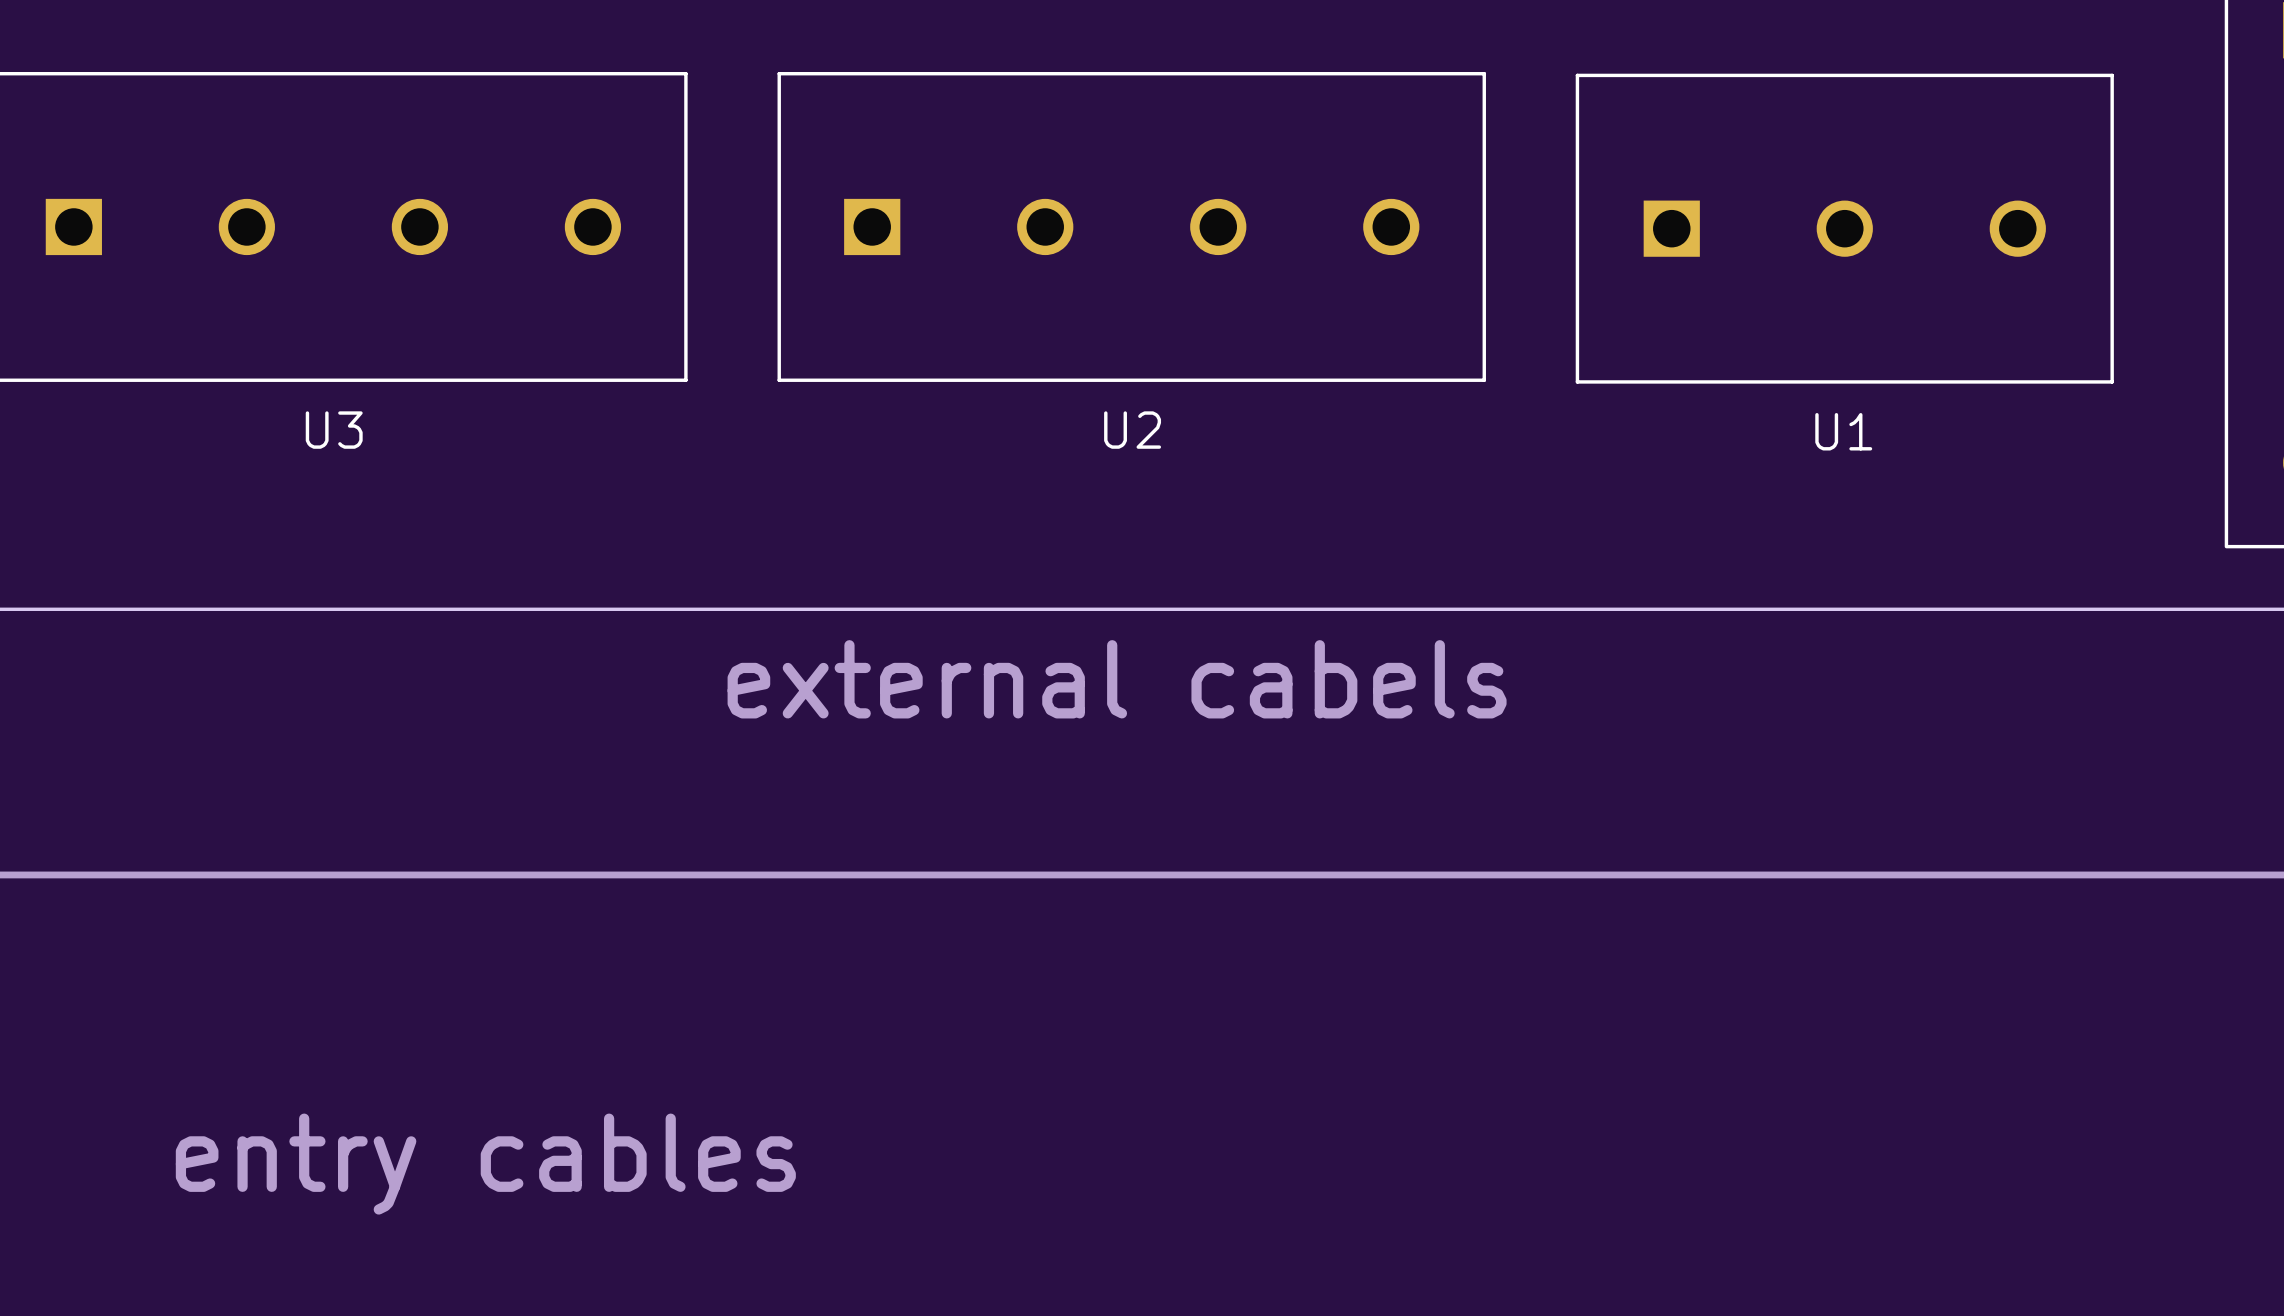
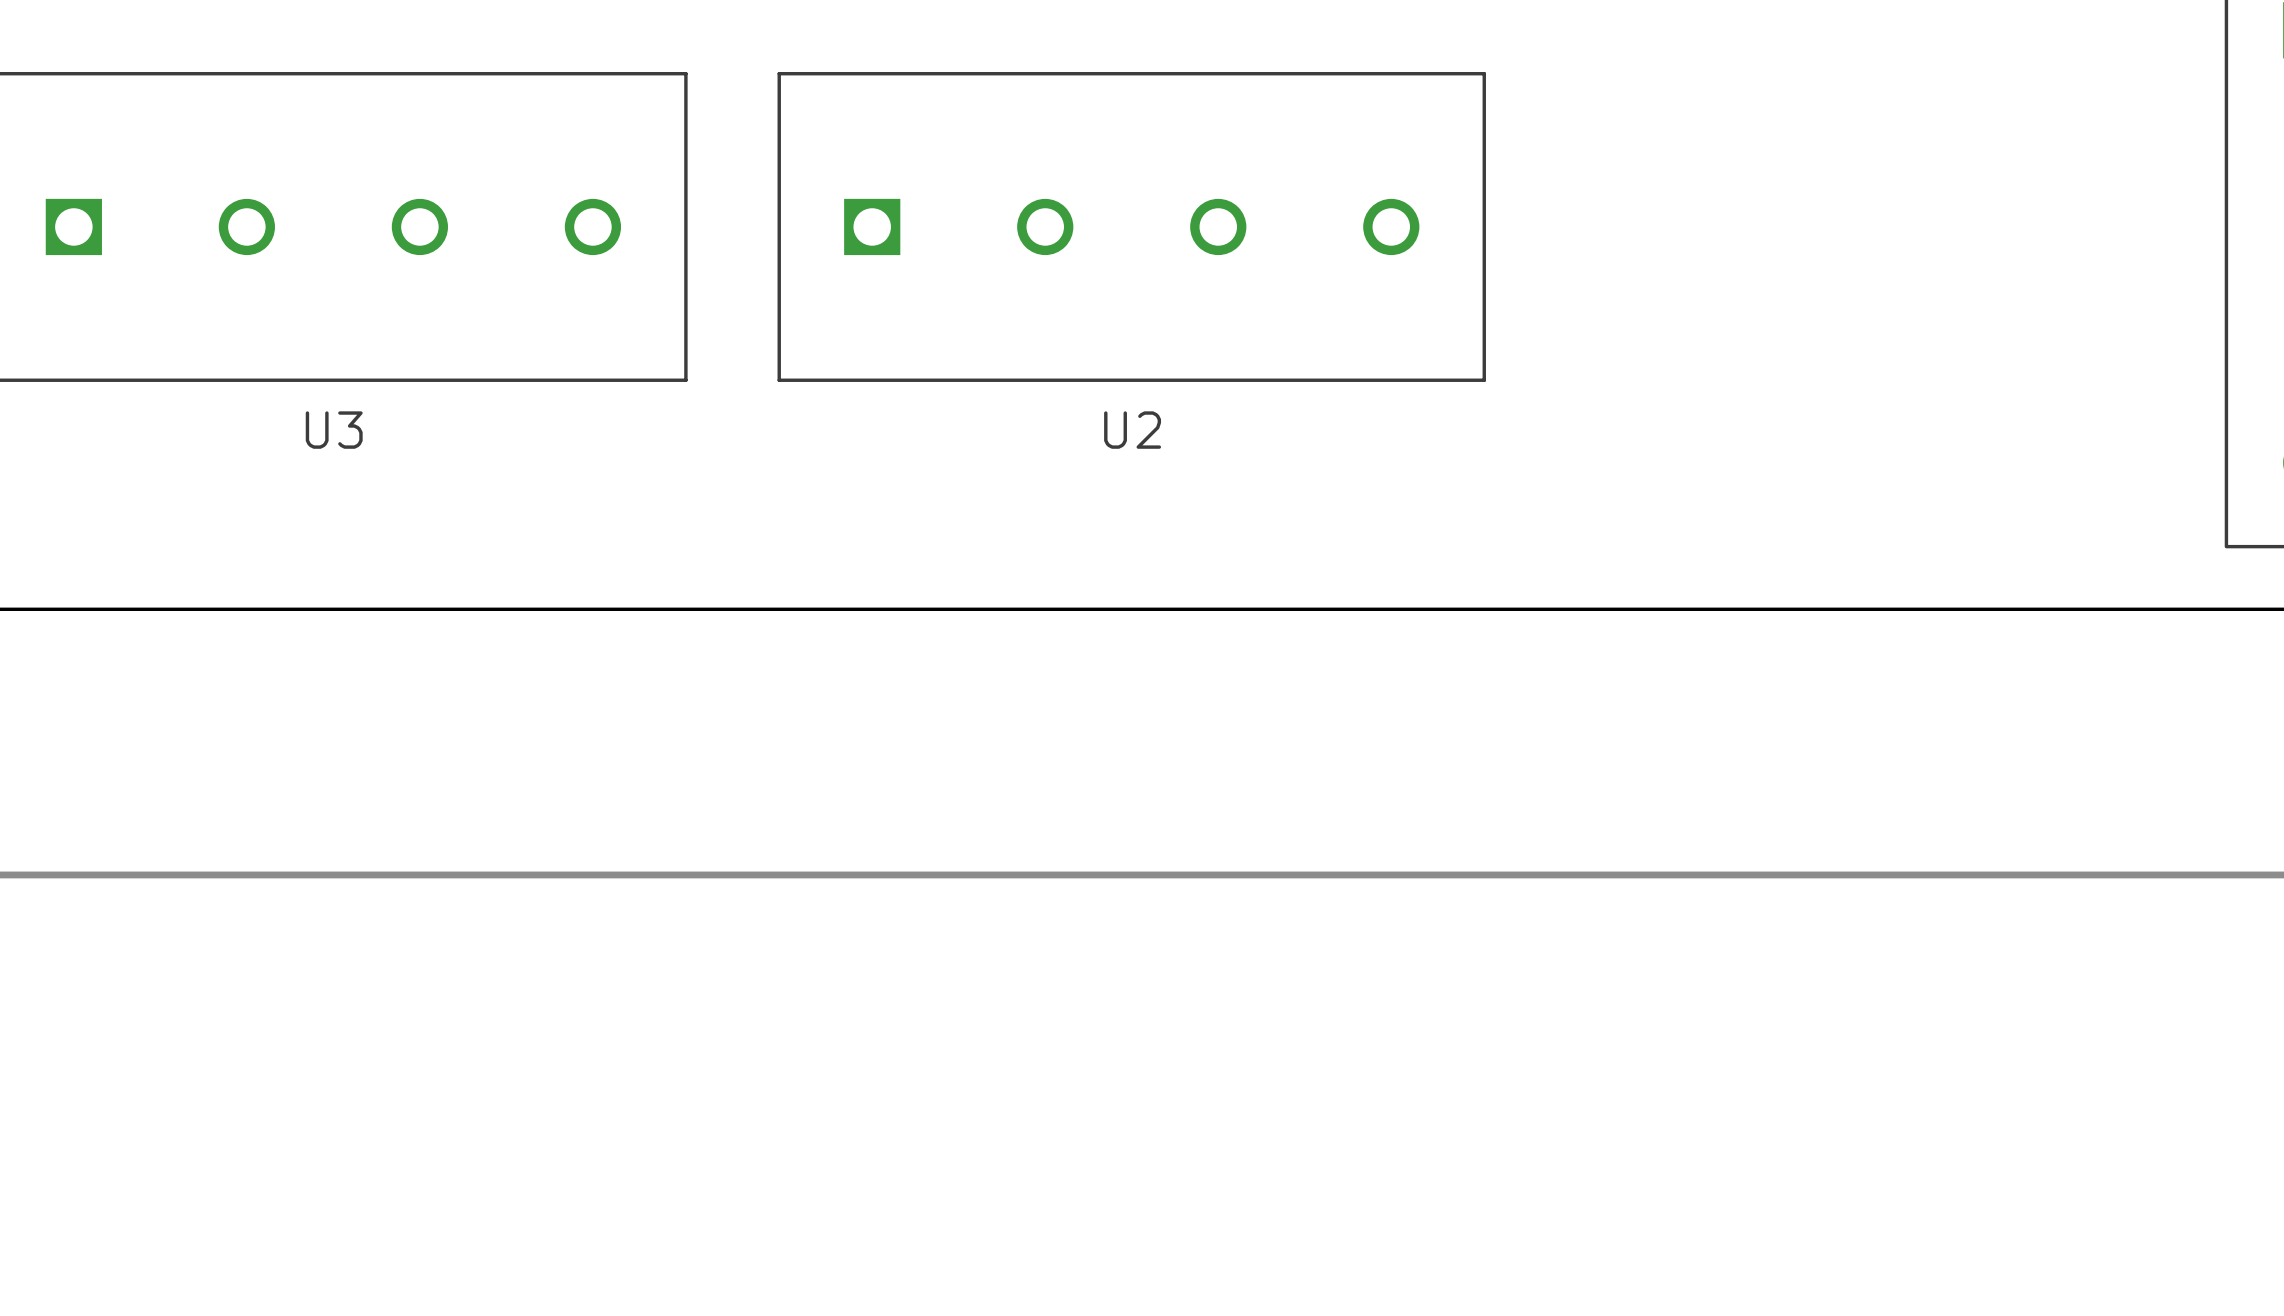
U1: (1844, 228) -> none
text: external cabels (1117, 679) -> none
text: entry cables (485, 1164) -> none

